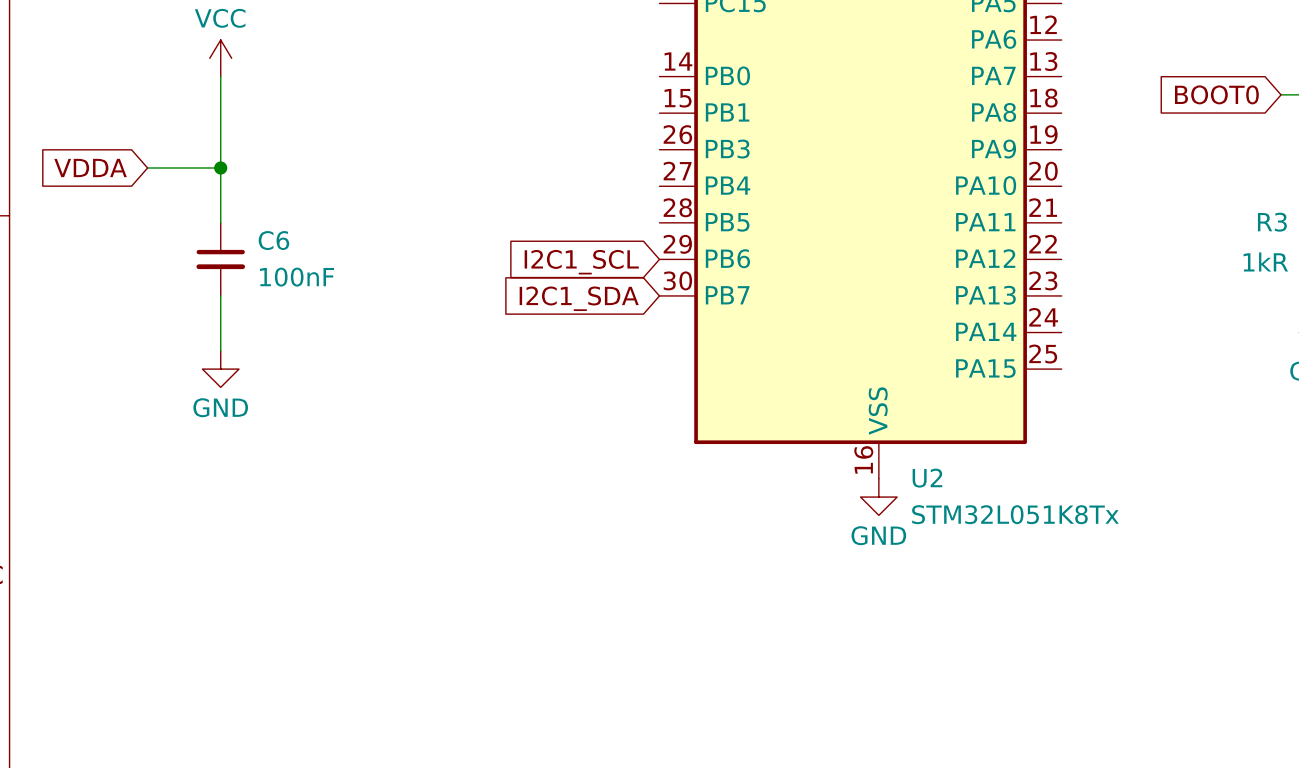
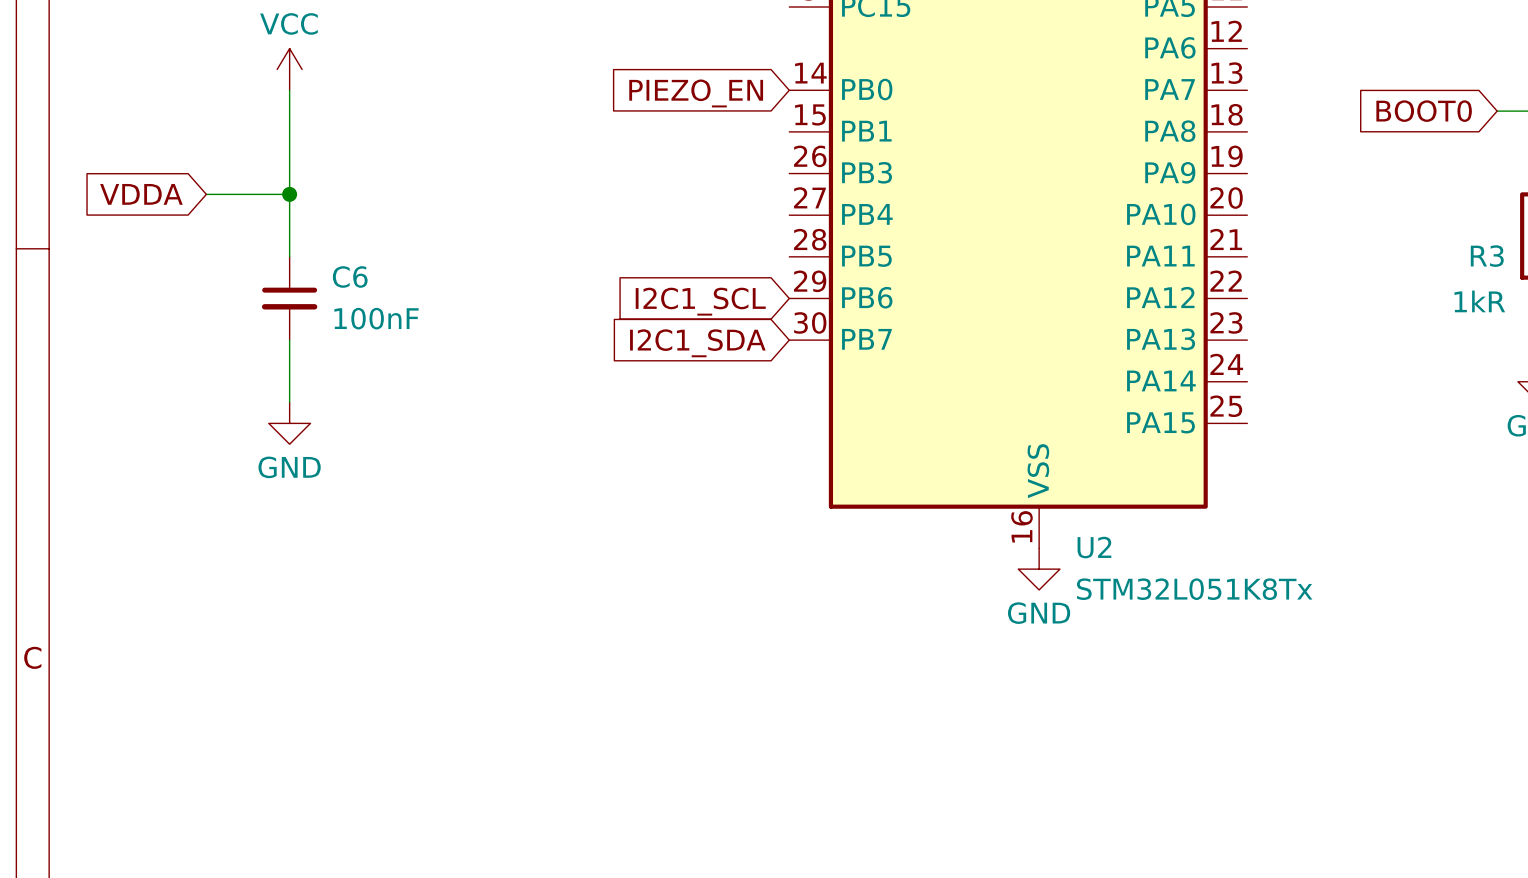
global label: none -> PIEZO_EN (696, 93)

